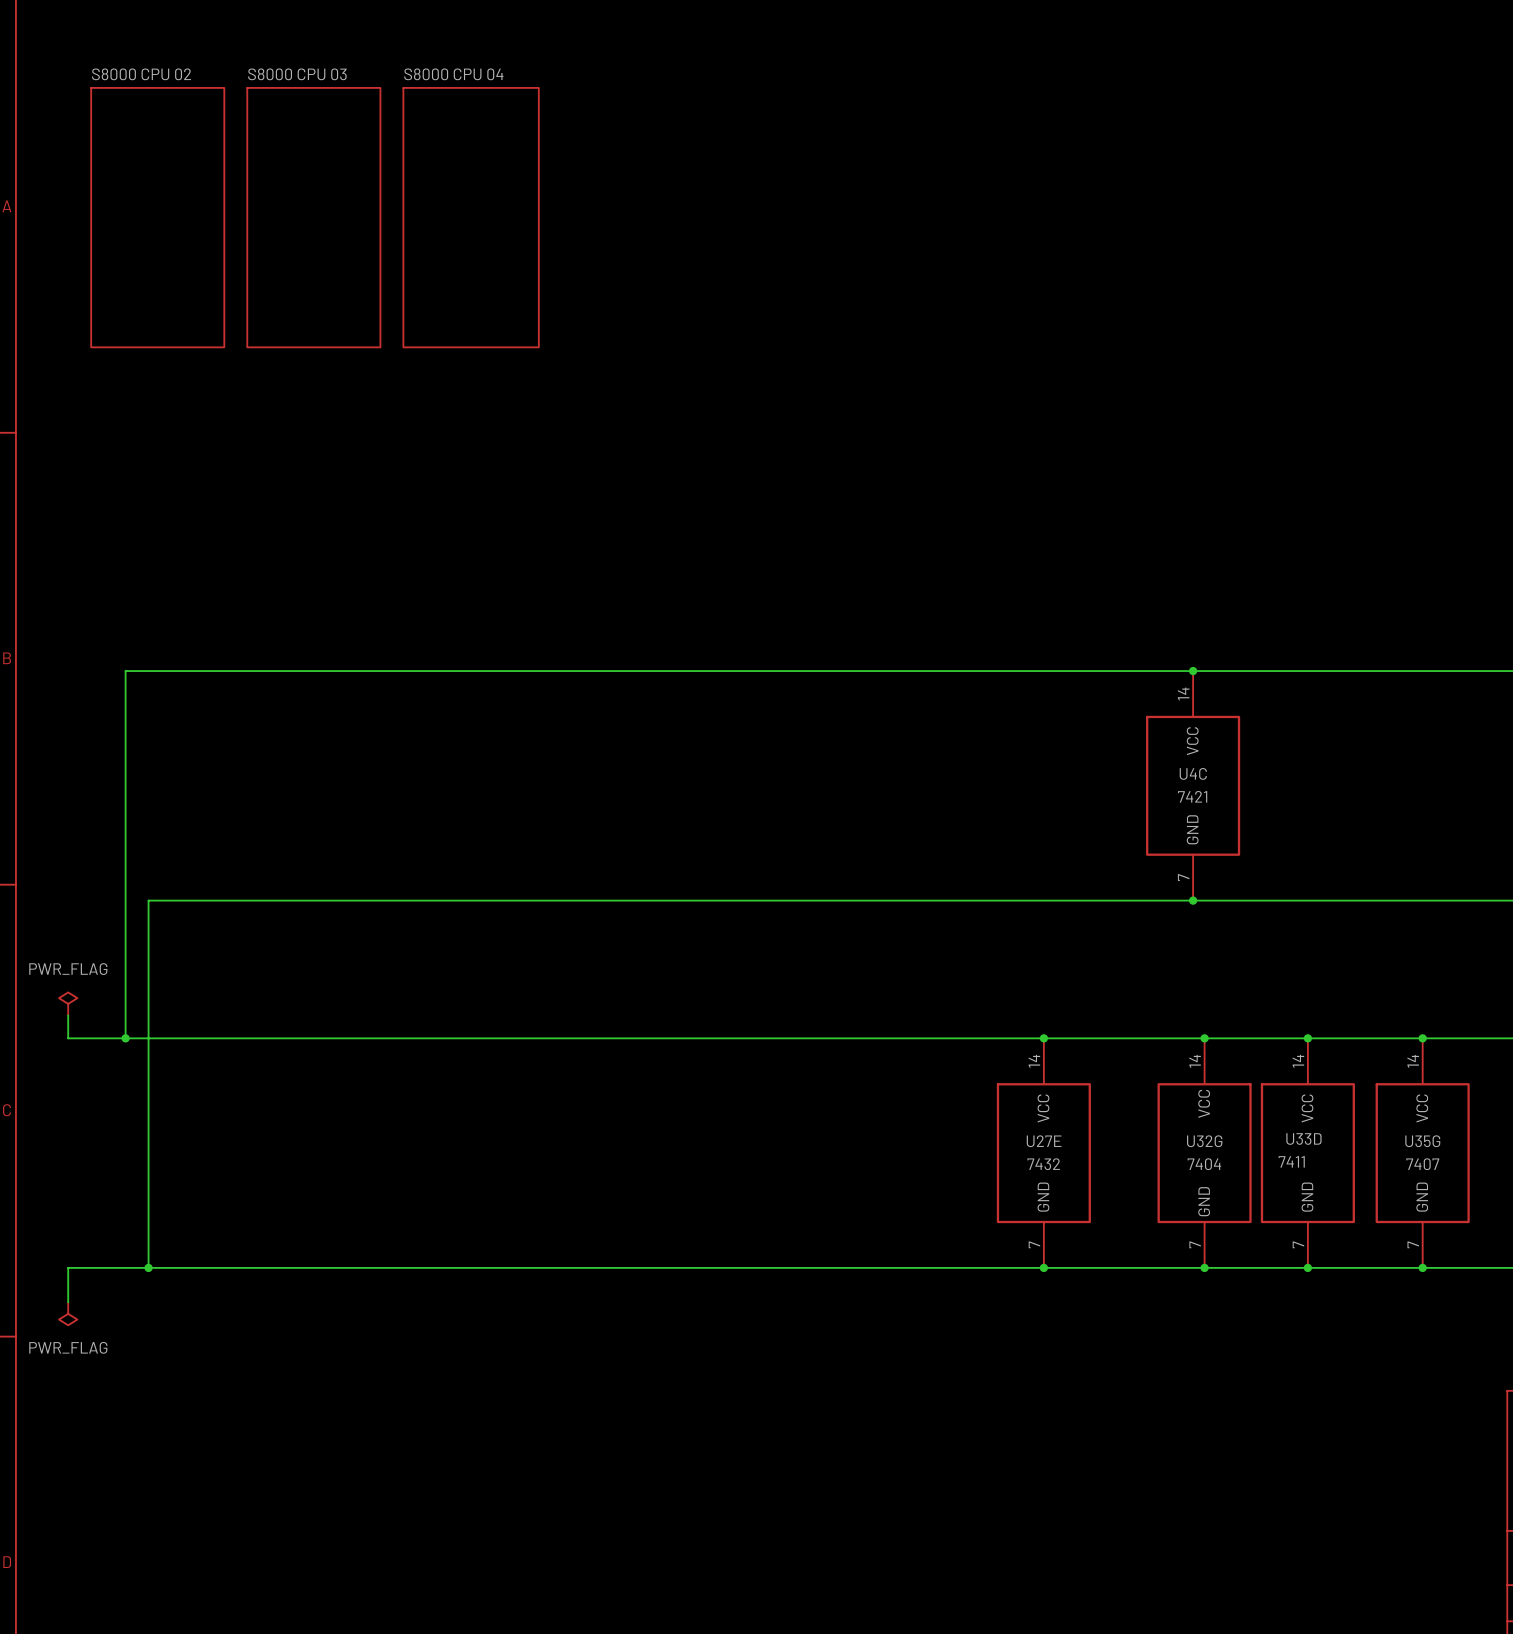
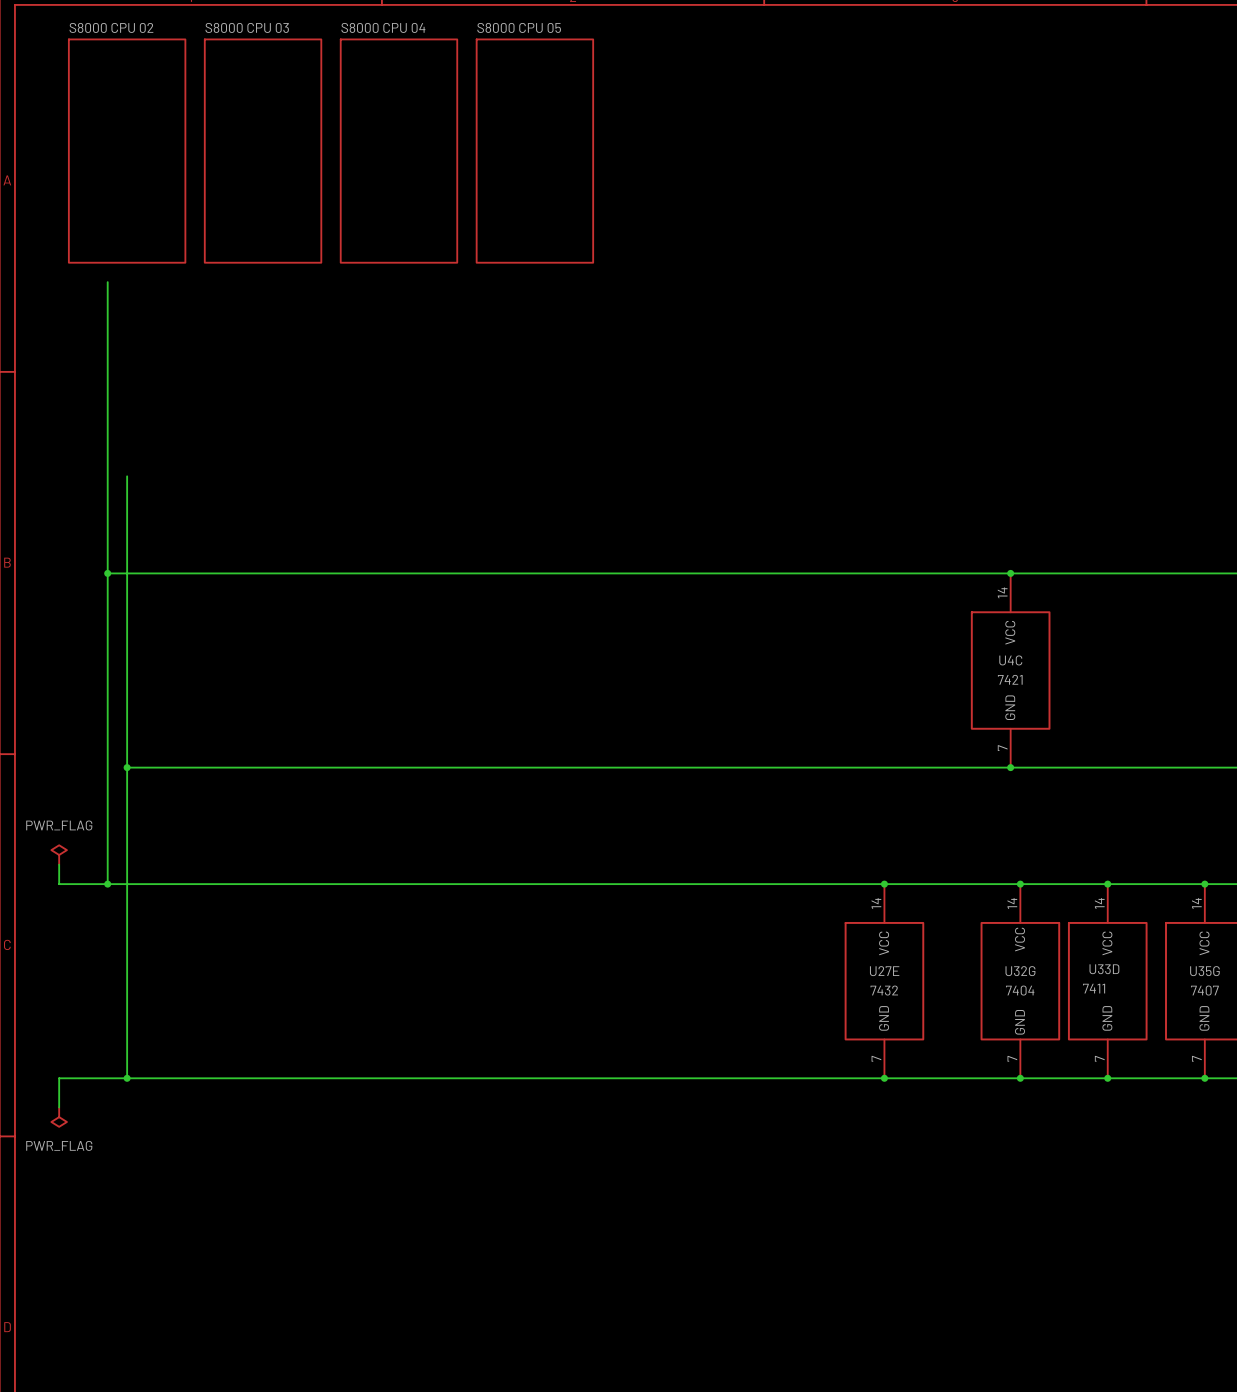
sheet S8000 CPU 02 shape: [90, 87, 226, 349] -> [68, 38, 186, 264]
sheet S8000 CPU 03 shape: [246, 87, 382, 349] -> [204, 38, 322, 264]
sheet S8000 CPU 04 shape: [402, 87, 540, 349] -> [340, 38, 458, 264]
sheet S8000 CPU 05: none -> (534, 151)
wire: none -> (107, 282) (107, 573)
wire: none -> (127, 476) (127, 767)
junction: none -> (107, 573)
junction: none -> (127, 767)

